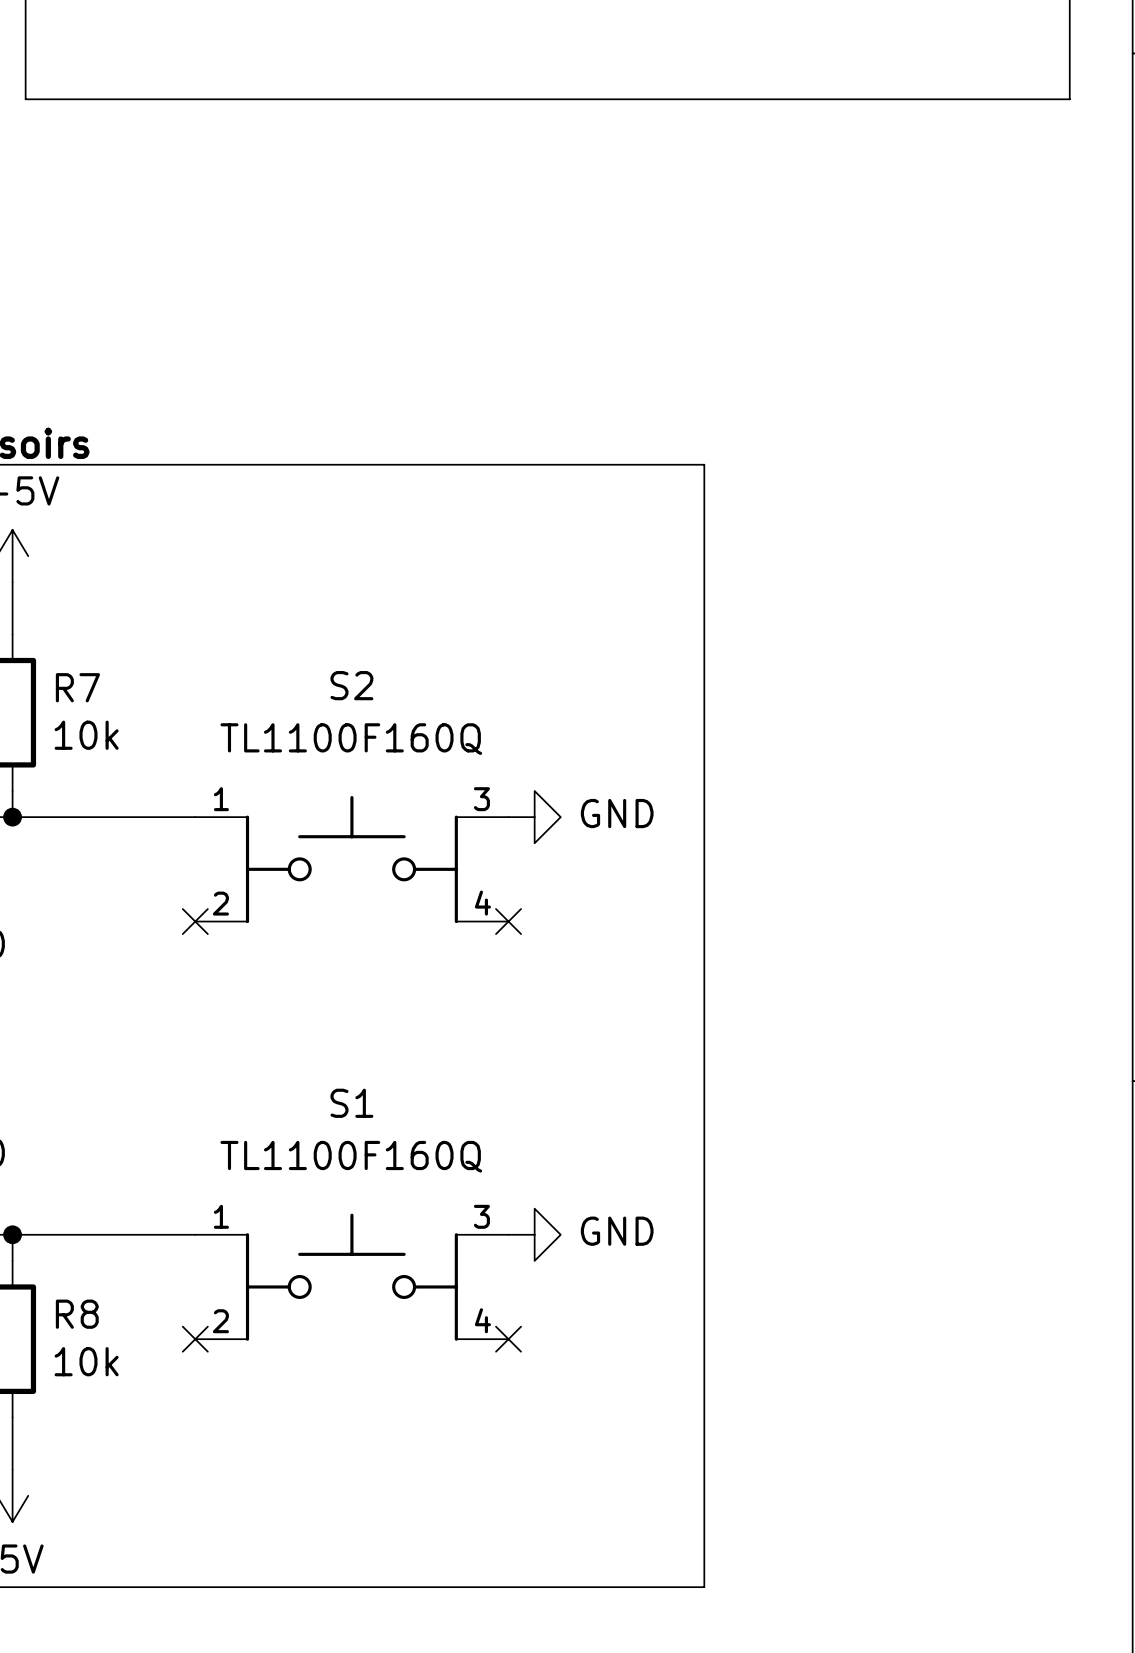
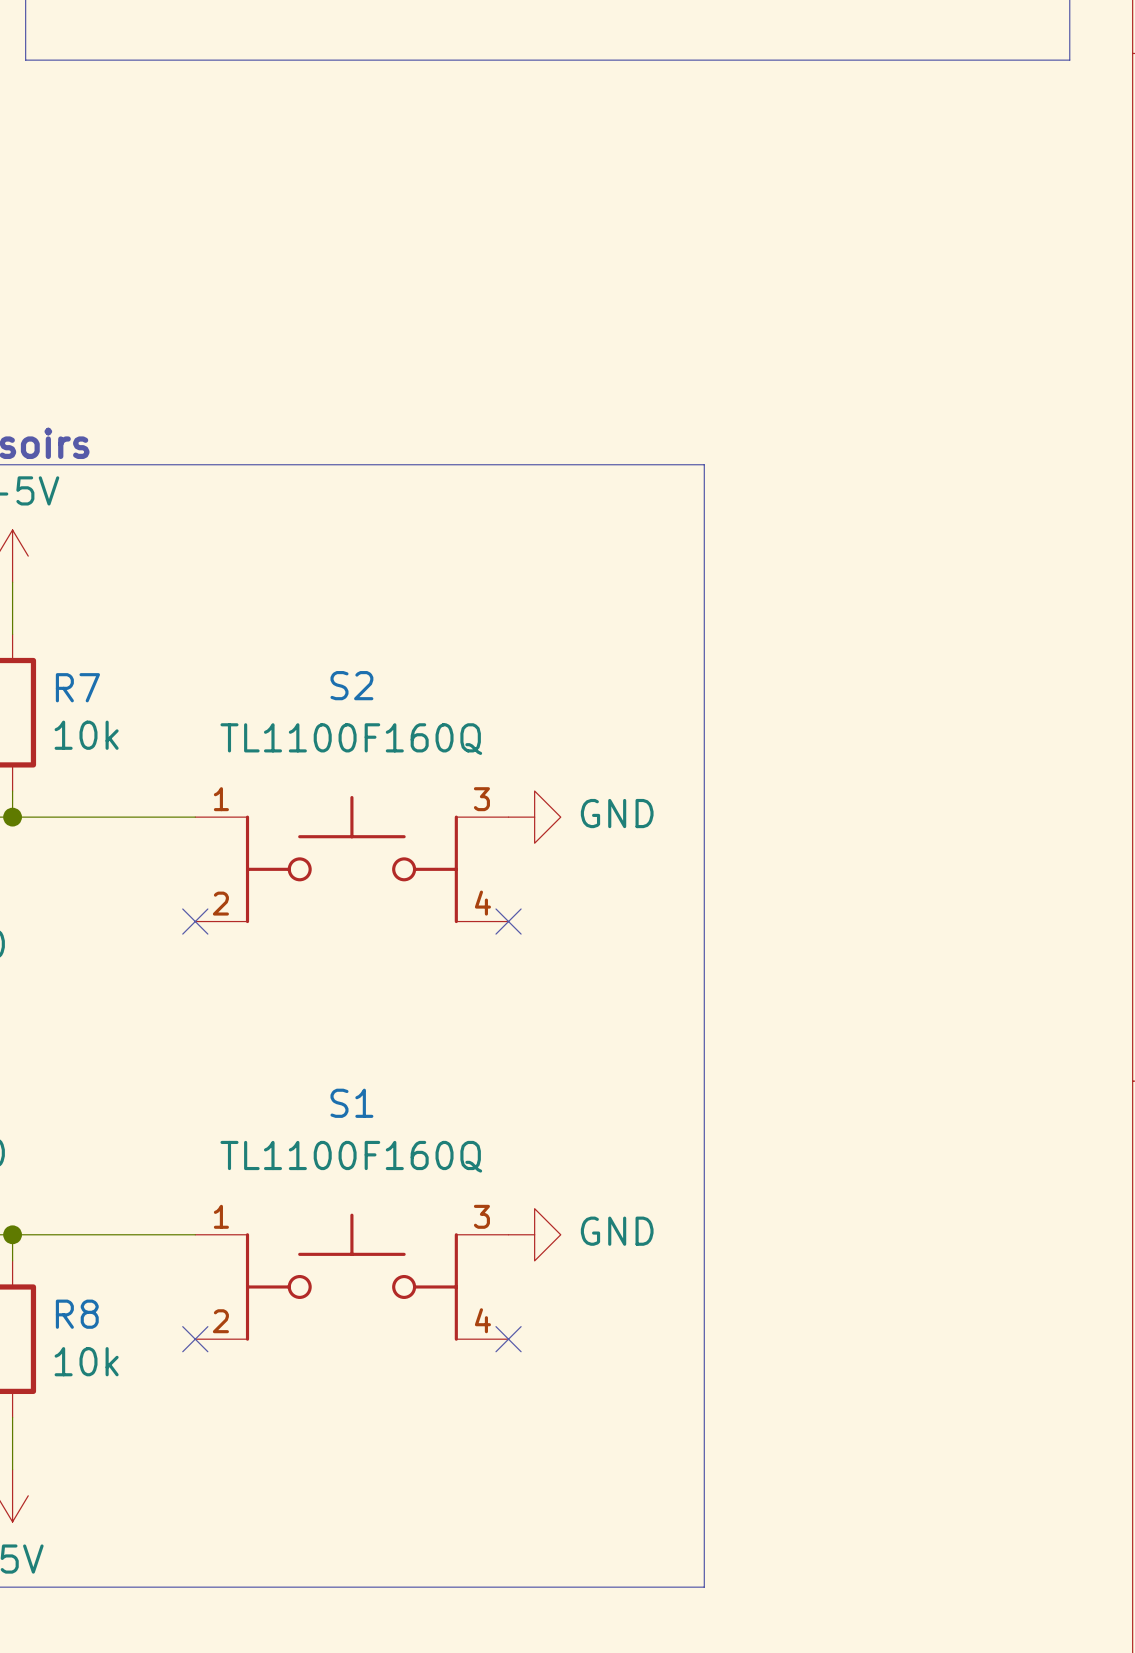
line: (25, 60) (25, 99) (1069, 99) (1069, 60) -> (25, 60) (1069, 60)

